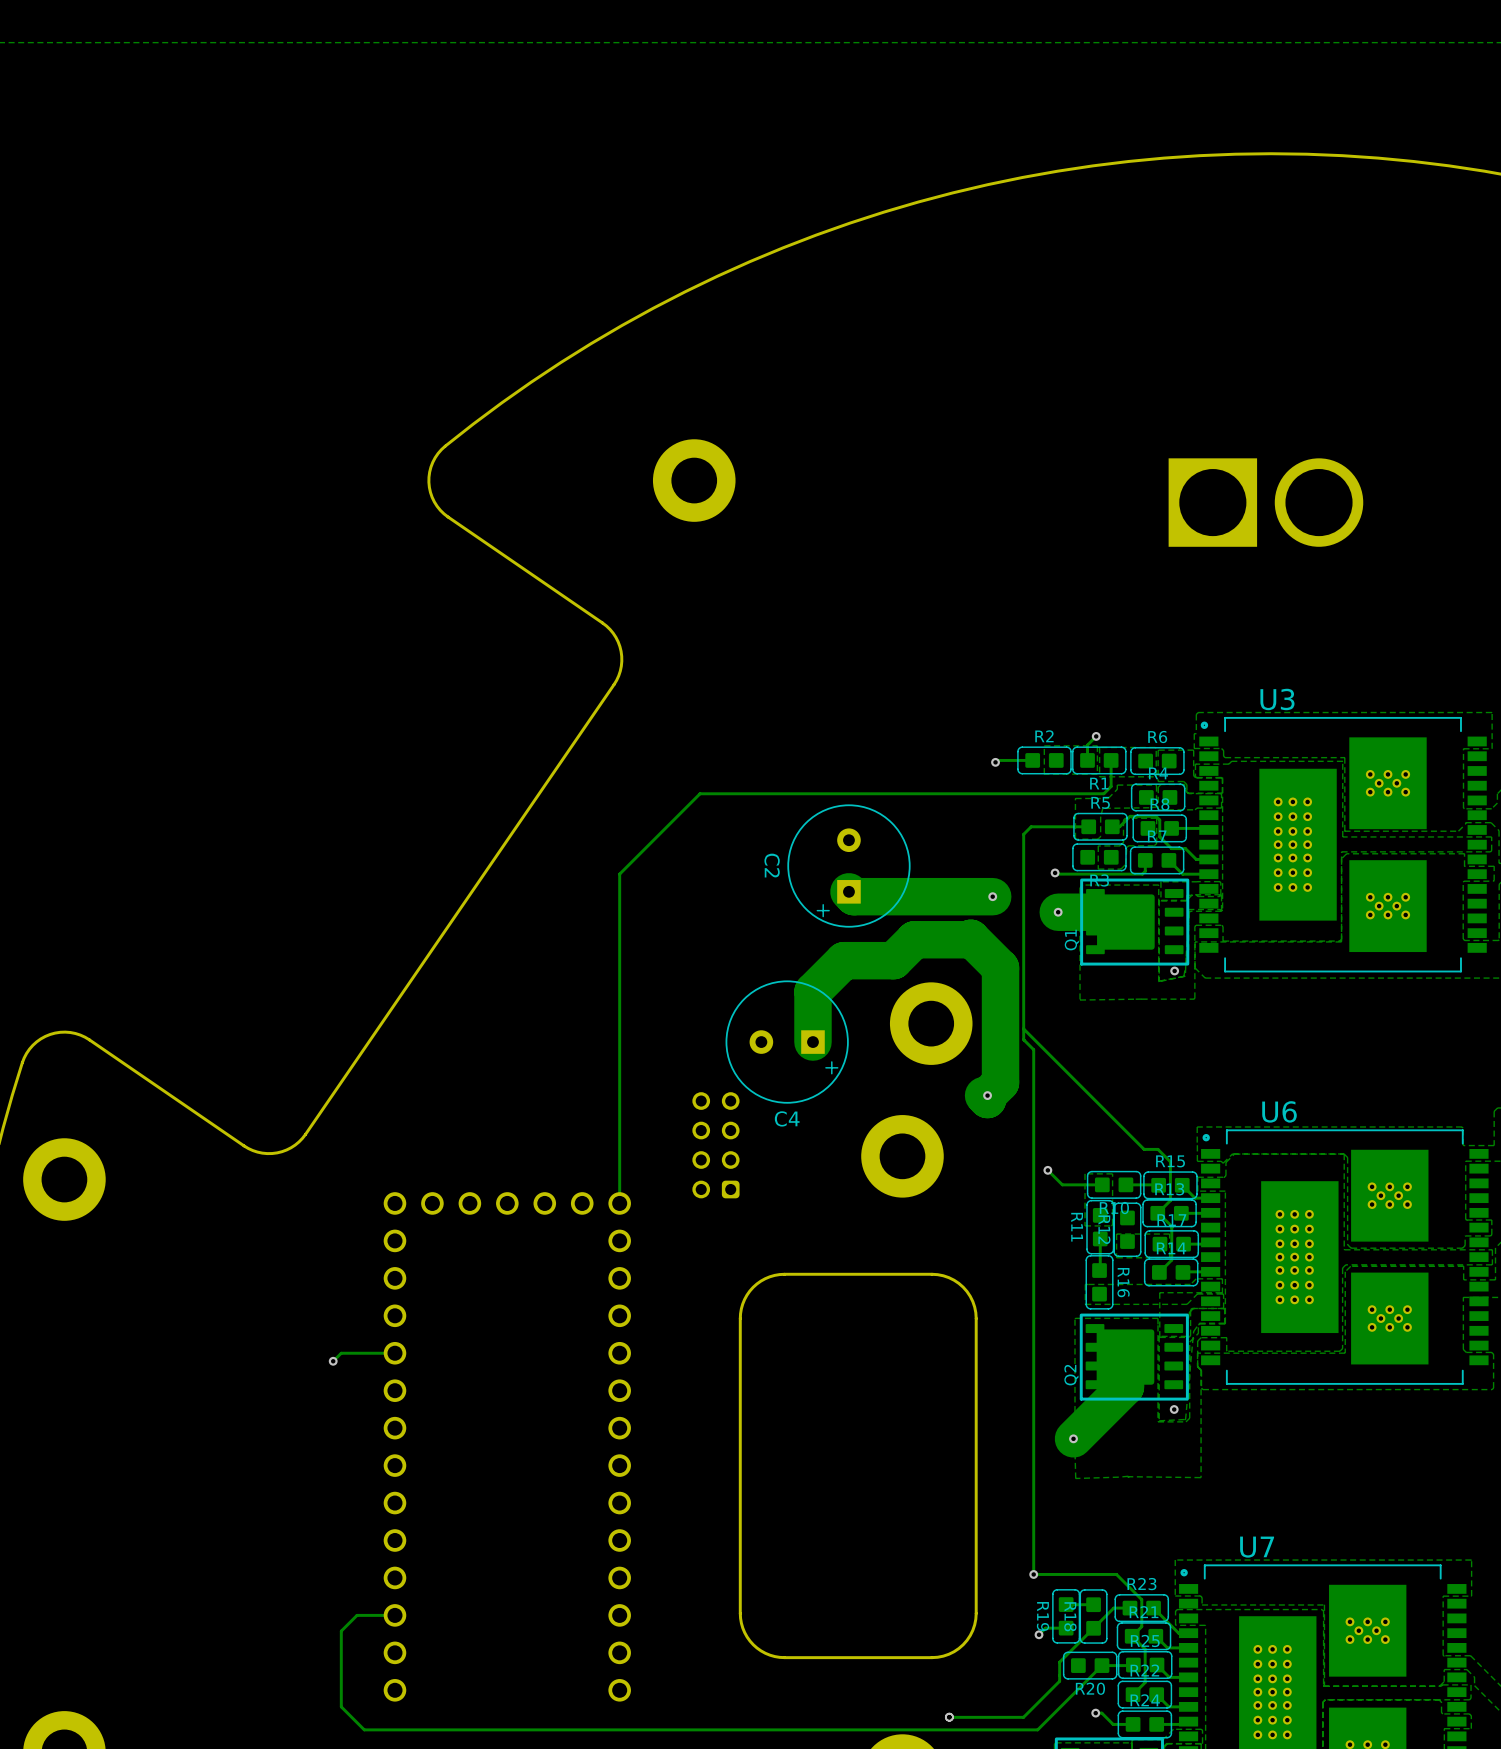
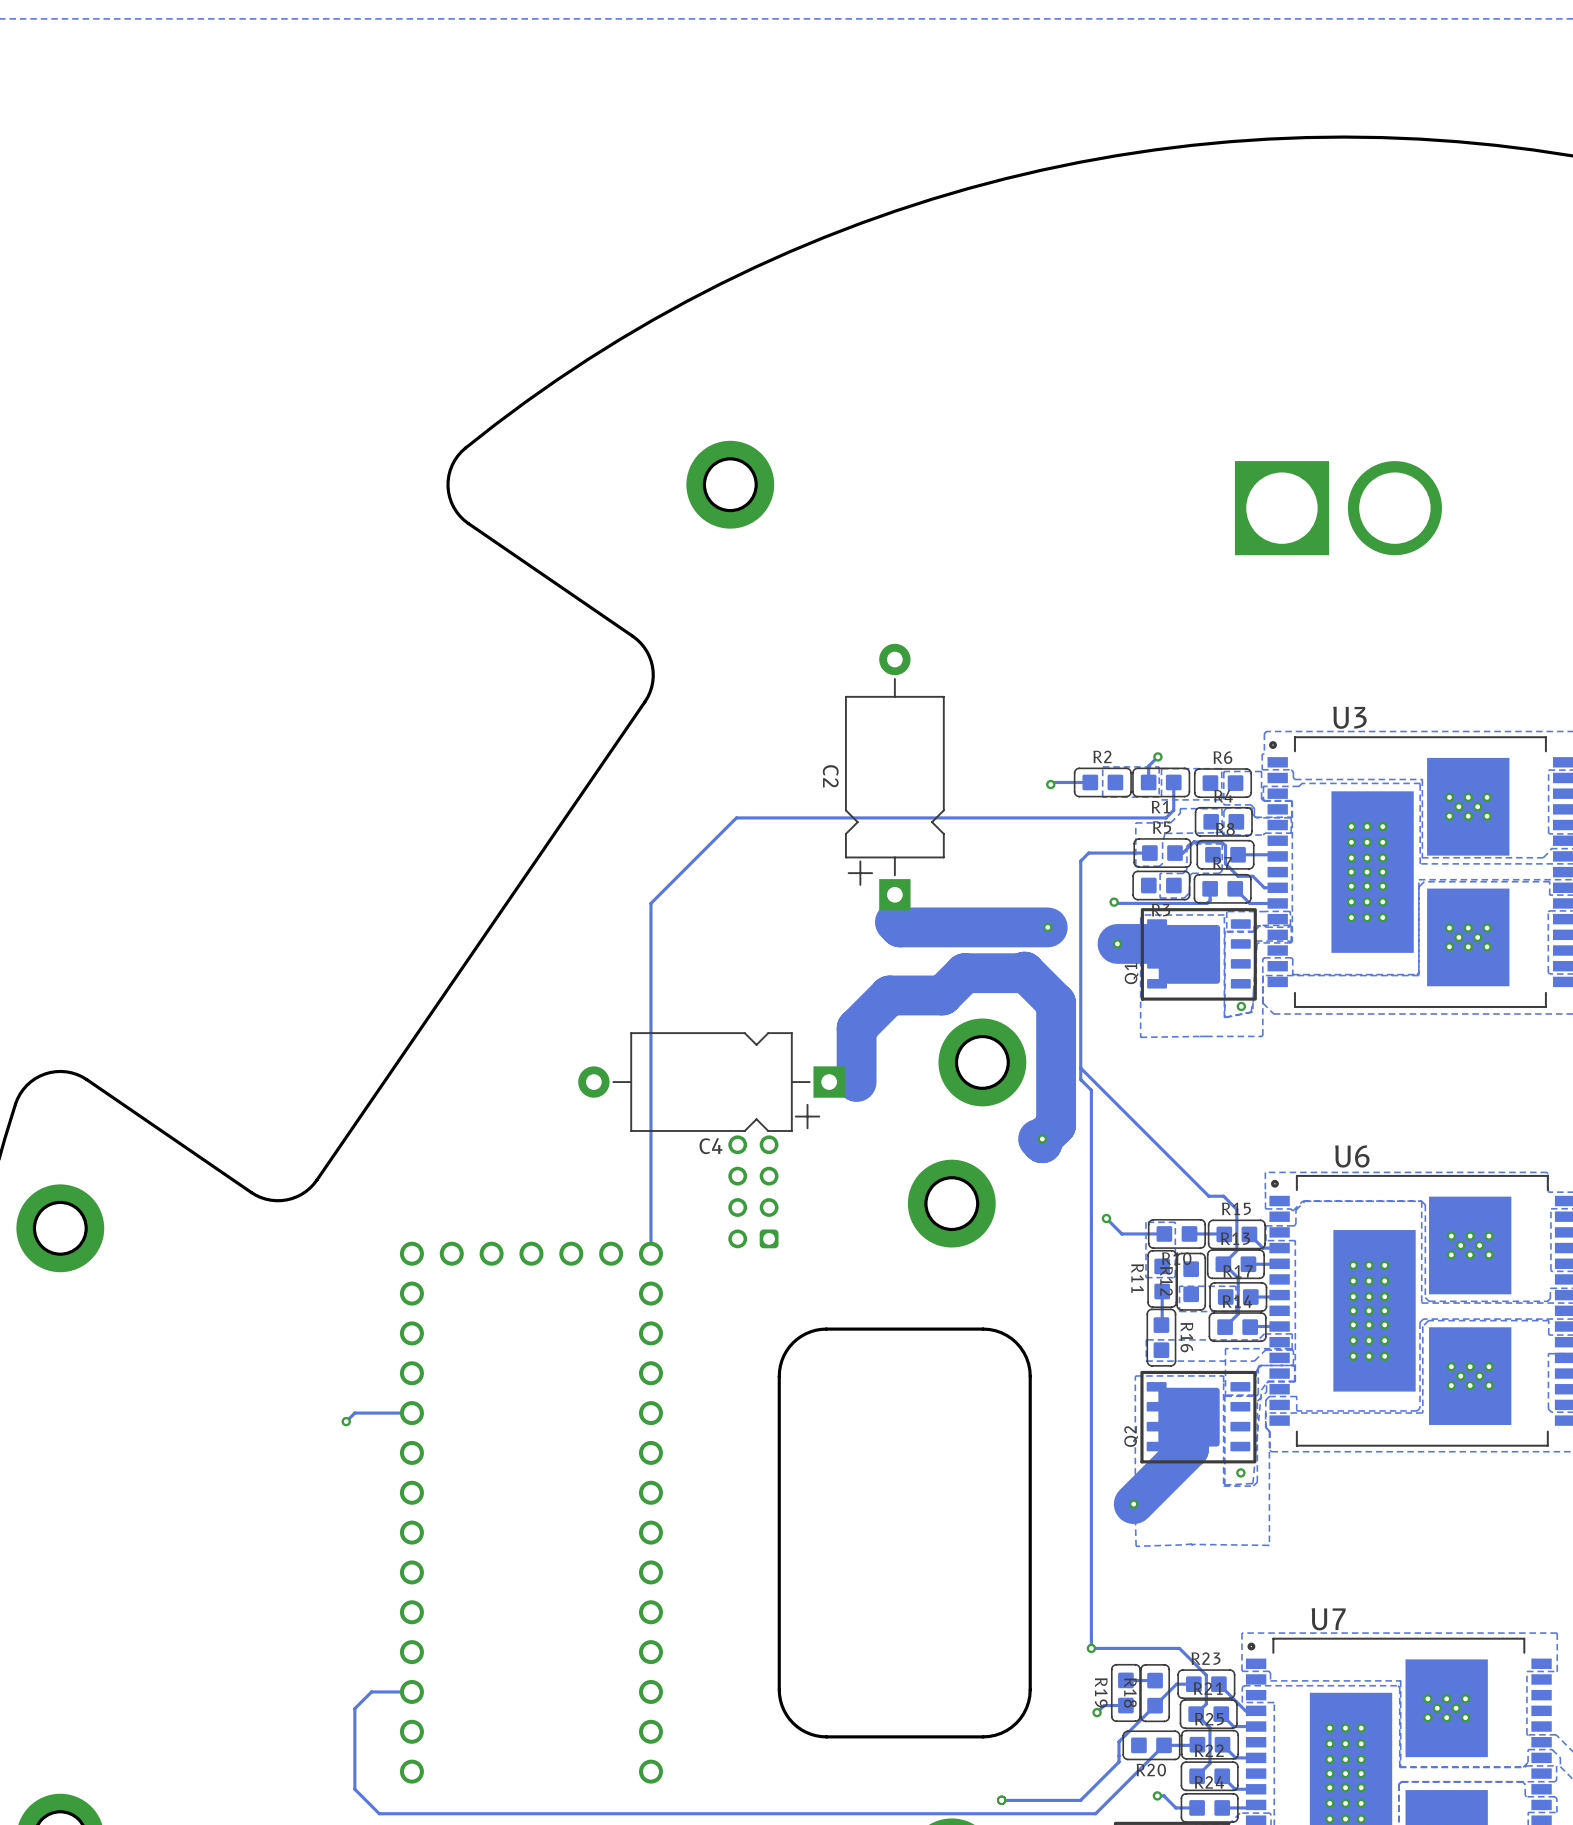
C2 footprint: [787, 804, 911, 928] -> [844, 643, 945, 911]
C4 footprint: [725, 980, 849, 1104] -> [578, 1032, 845, 1132]

